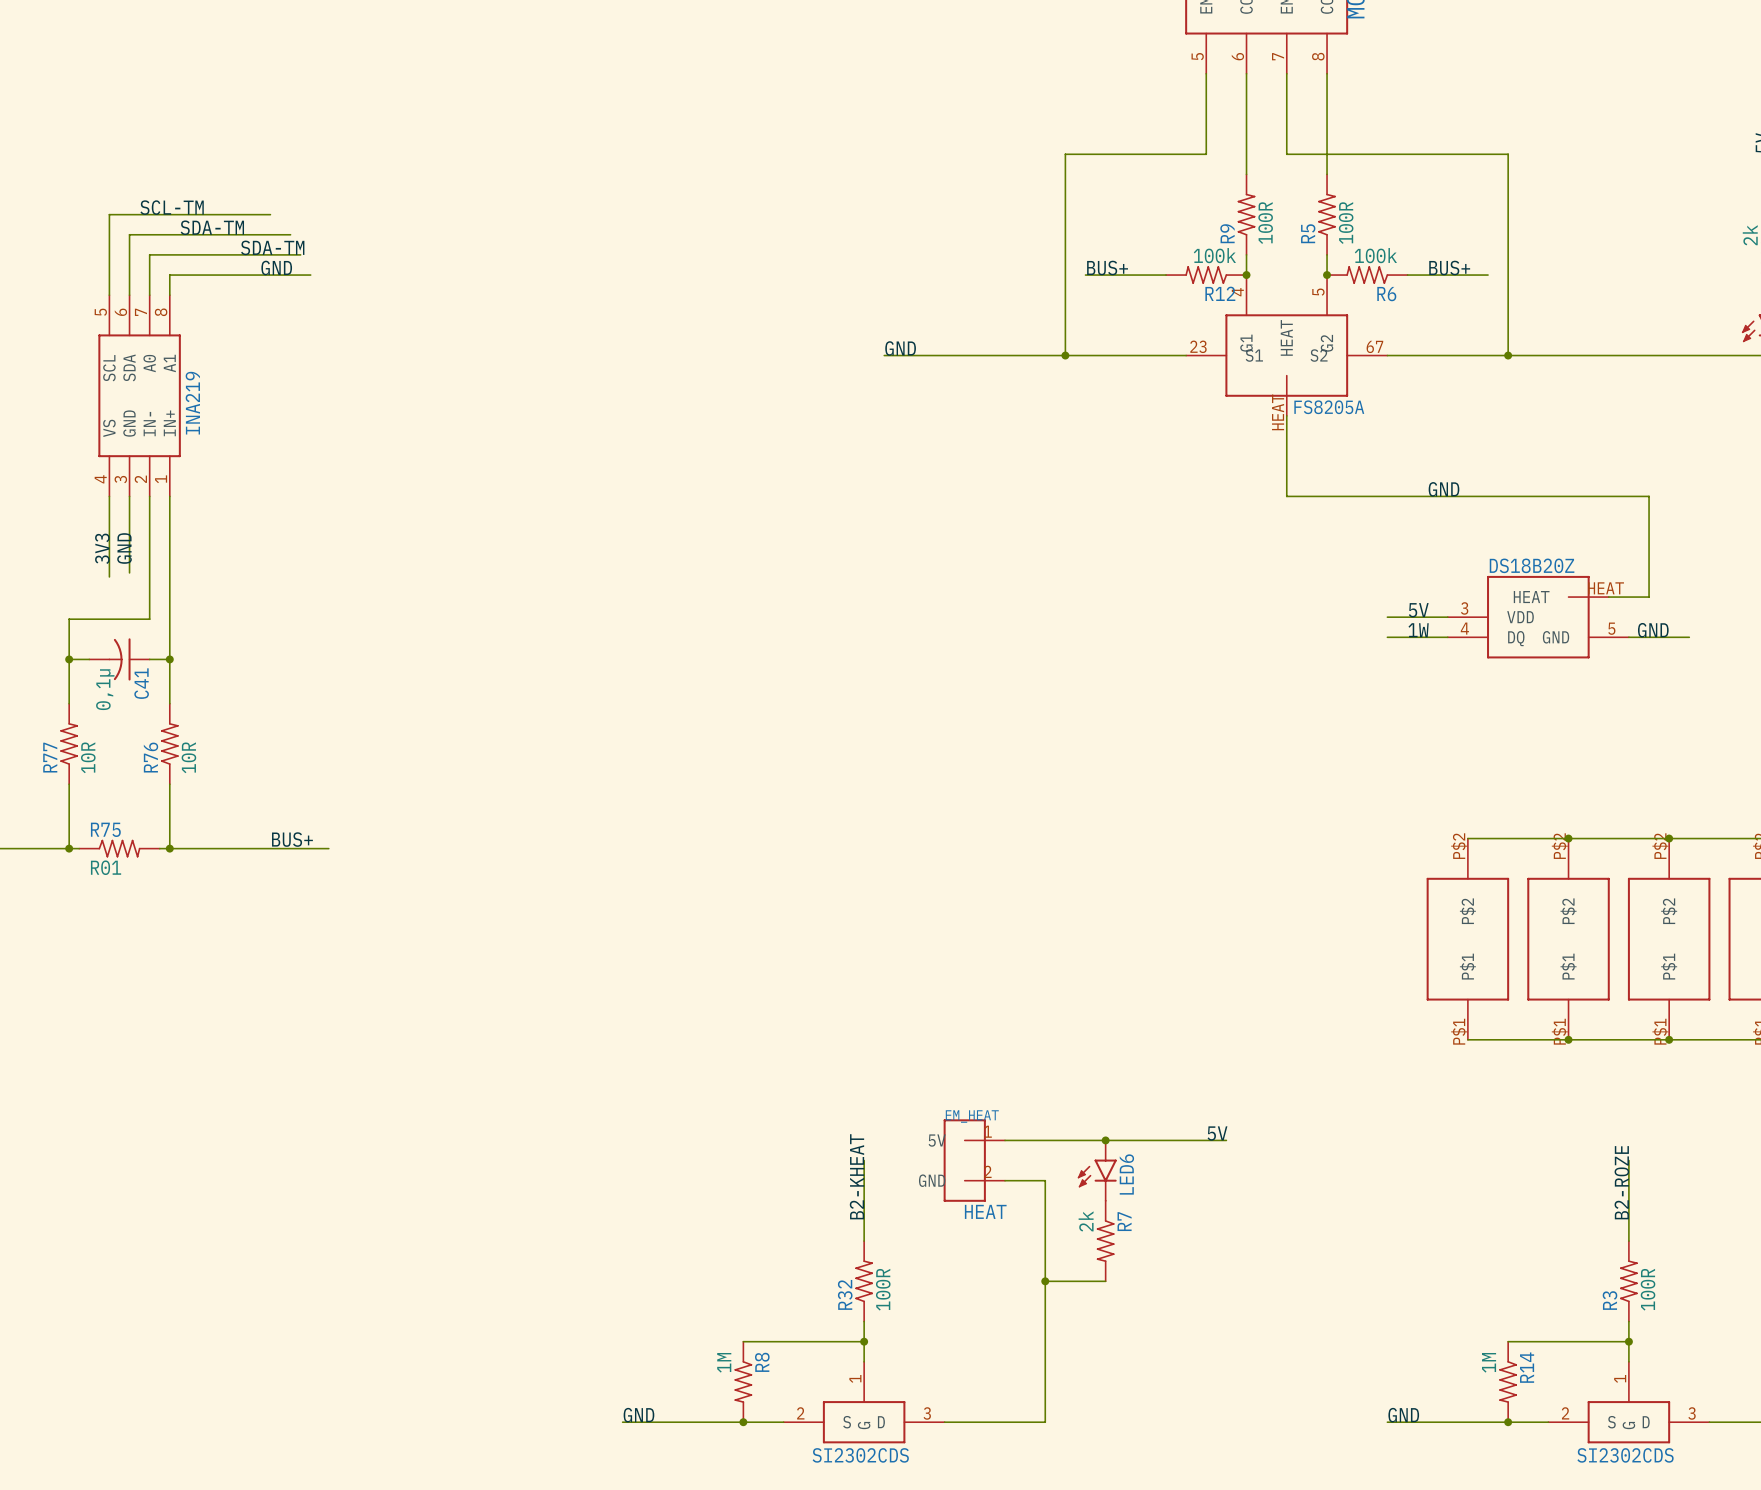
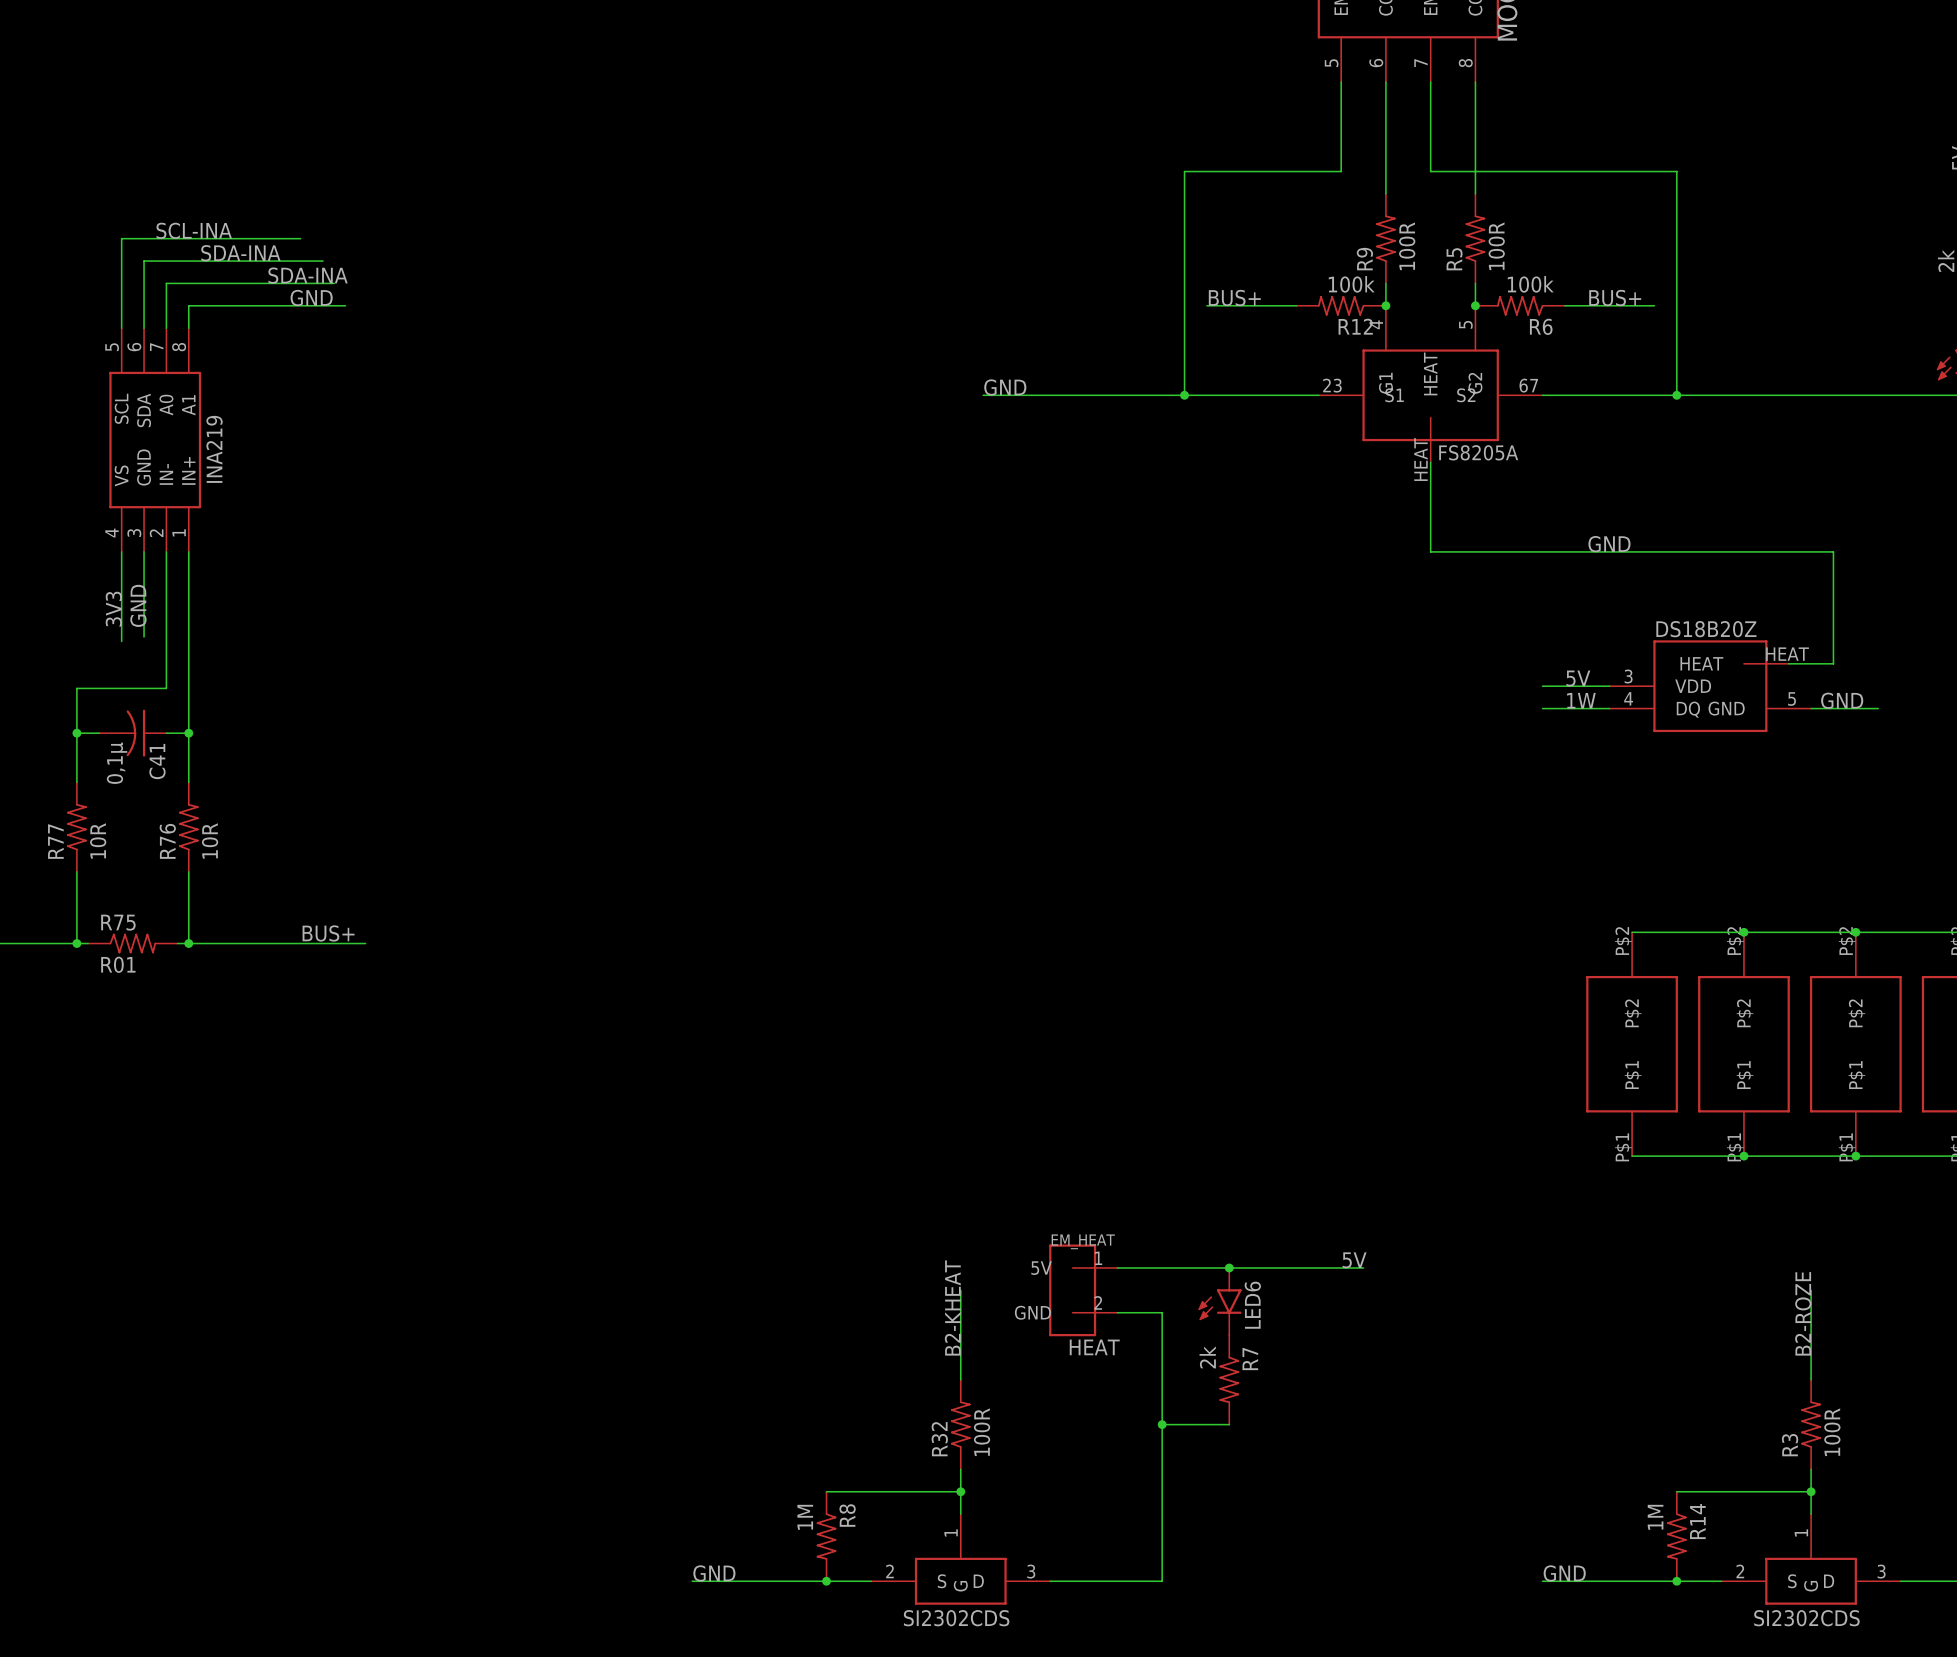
label: SCL-TM (172, 207) -> SCL-INA (194, 230)
label: SDA-TM (212, 227) -> SDA-INA (240, 253)
label: SDA-TM (272, 247) -> SDA-INA (308, 275)

